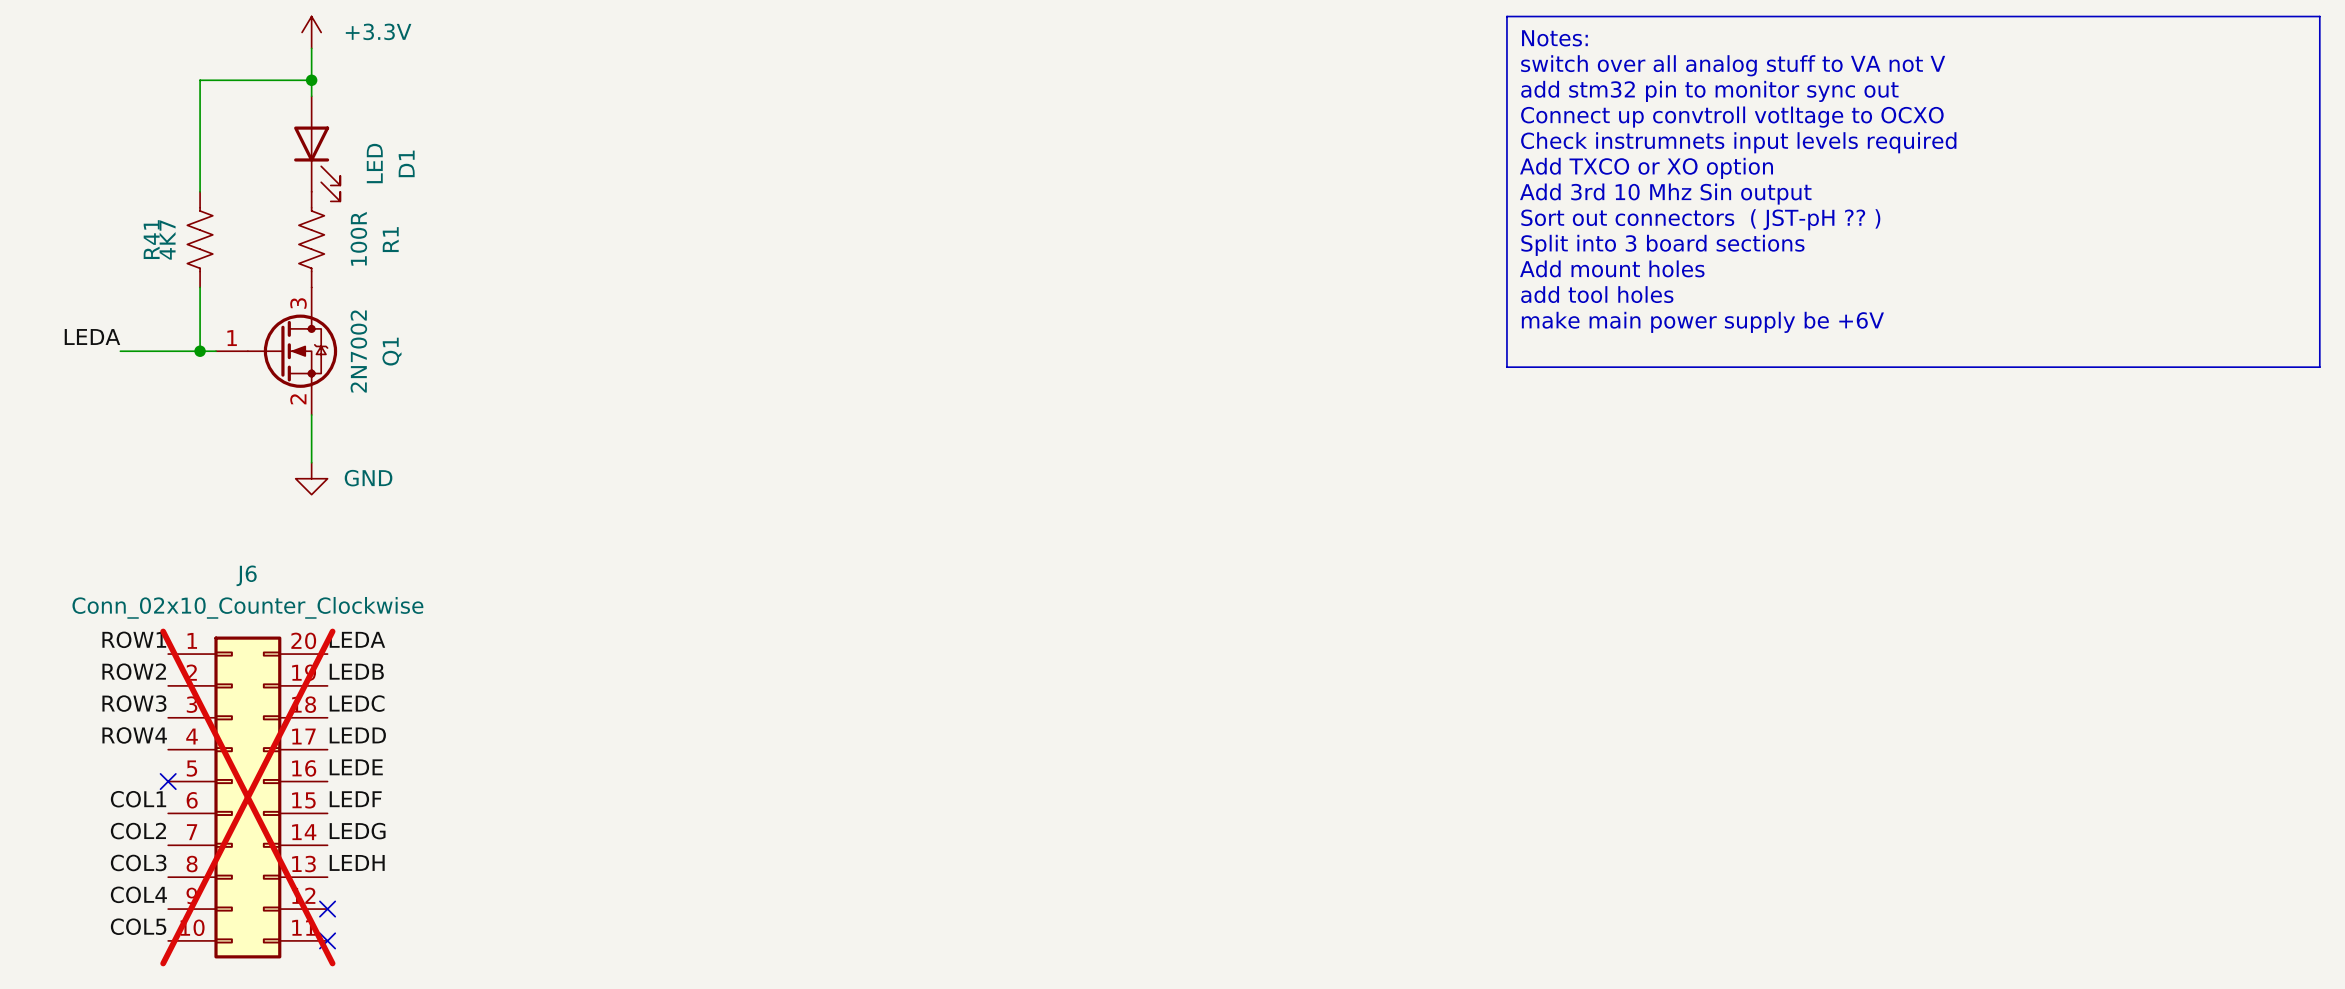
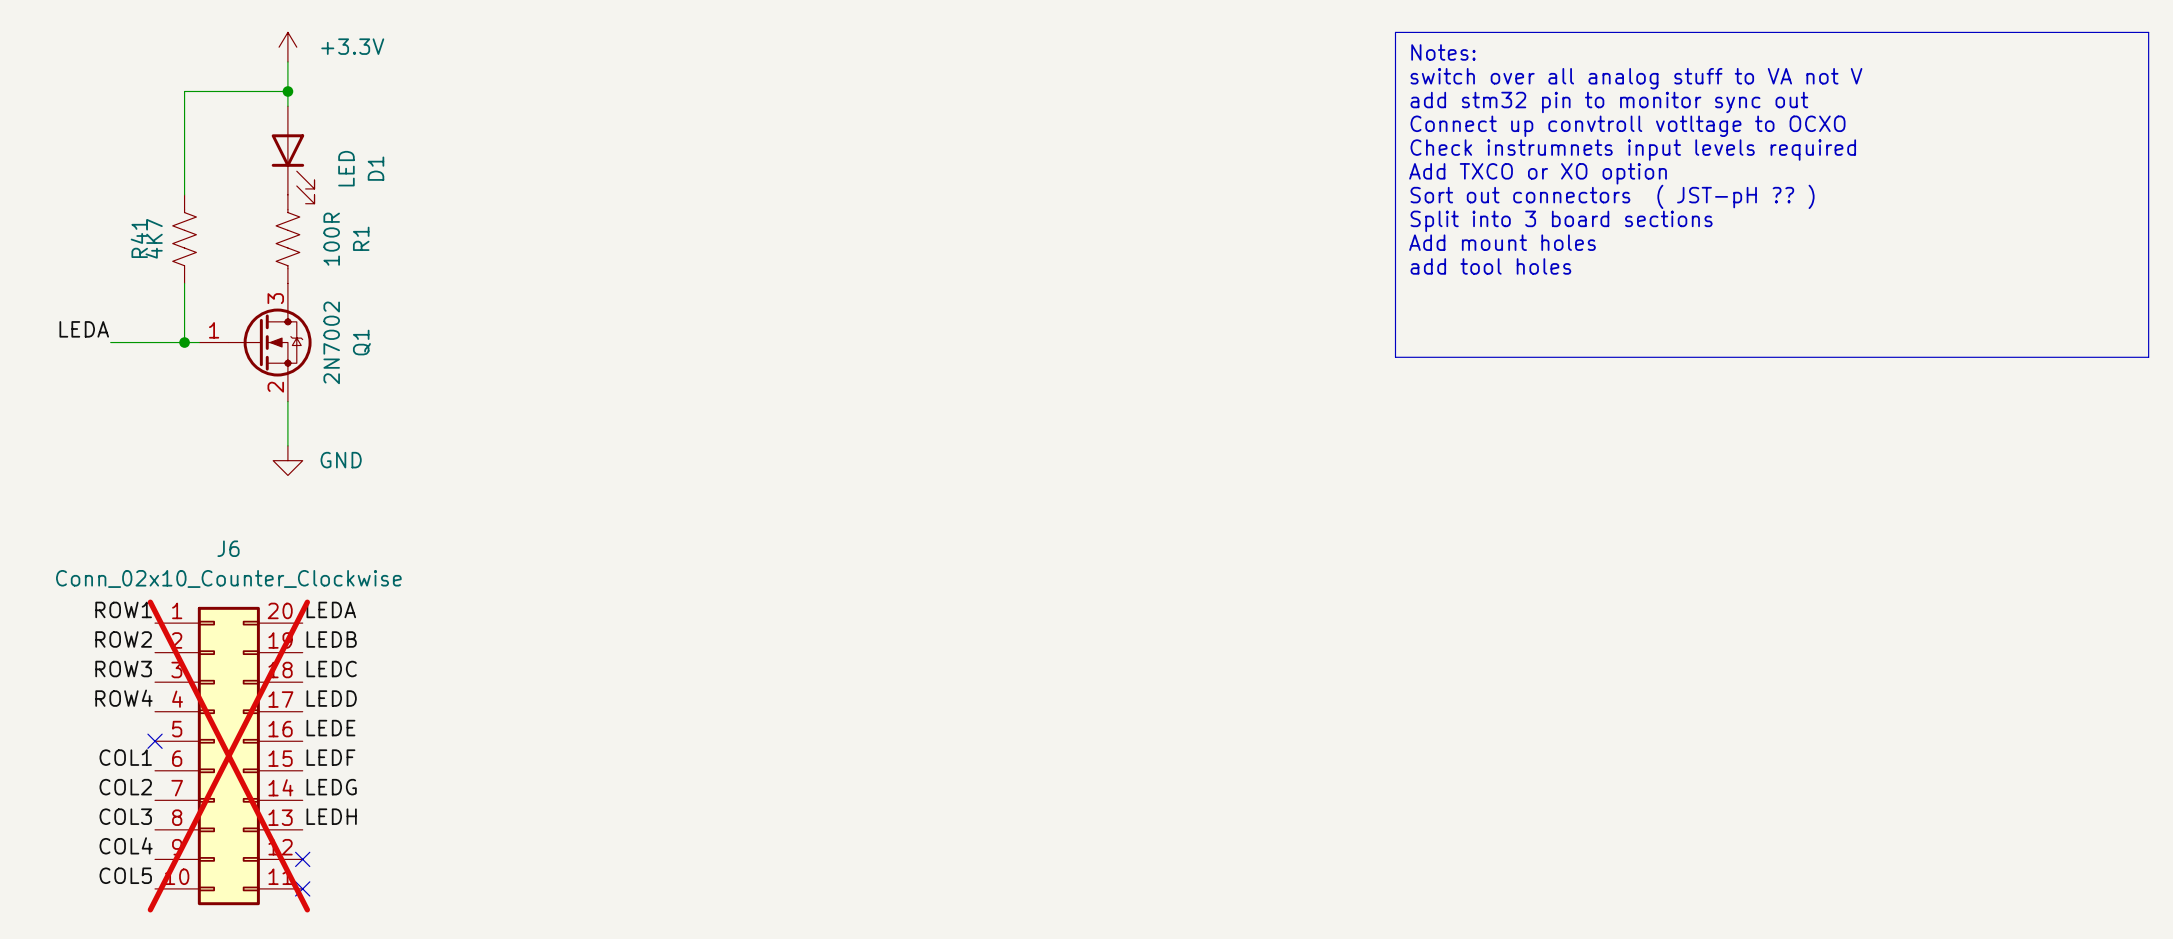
text: Add 3rd 10 Mhz Sin output (1665, 194) -> Sort out connectors ( JST-pH ?? ) (1612, 196)
text: Sort out connectors ( JST-pH ?? ) (1700, 219) -> Split into 3 board sections (1561, 221)
text: Split into 3 board sections (1662, 245) -> Add mount holes (1502, 242)
text: Add mount holes (1612, 268) -> add tool holes (1490, 266)
text: add tool holes (1597, 294) -> none
text: make main power supply be +6V (1702, 322) -> none

